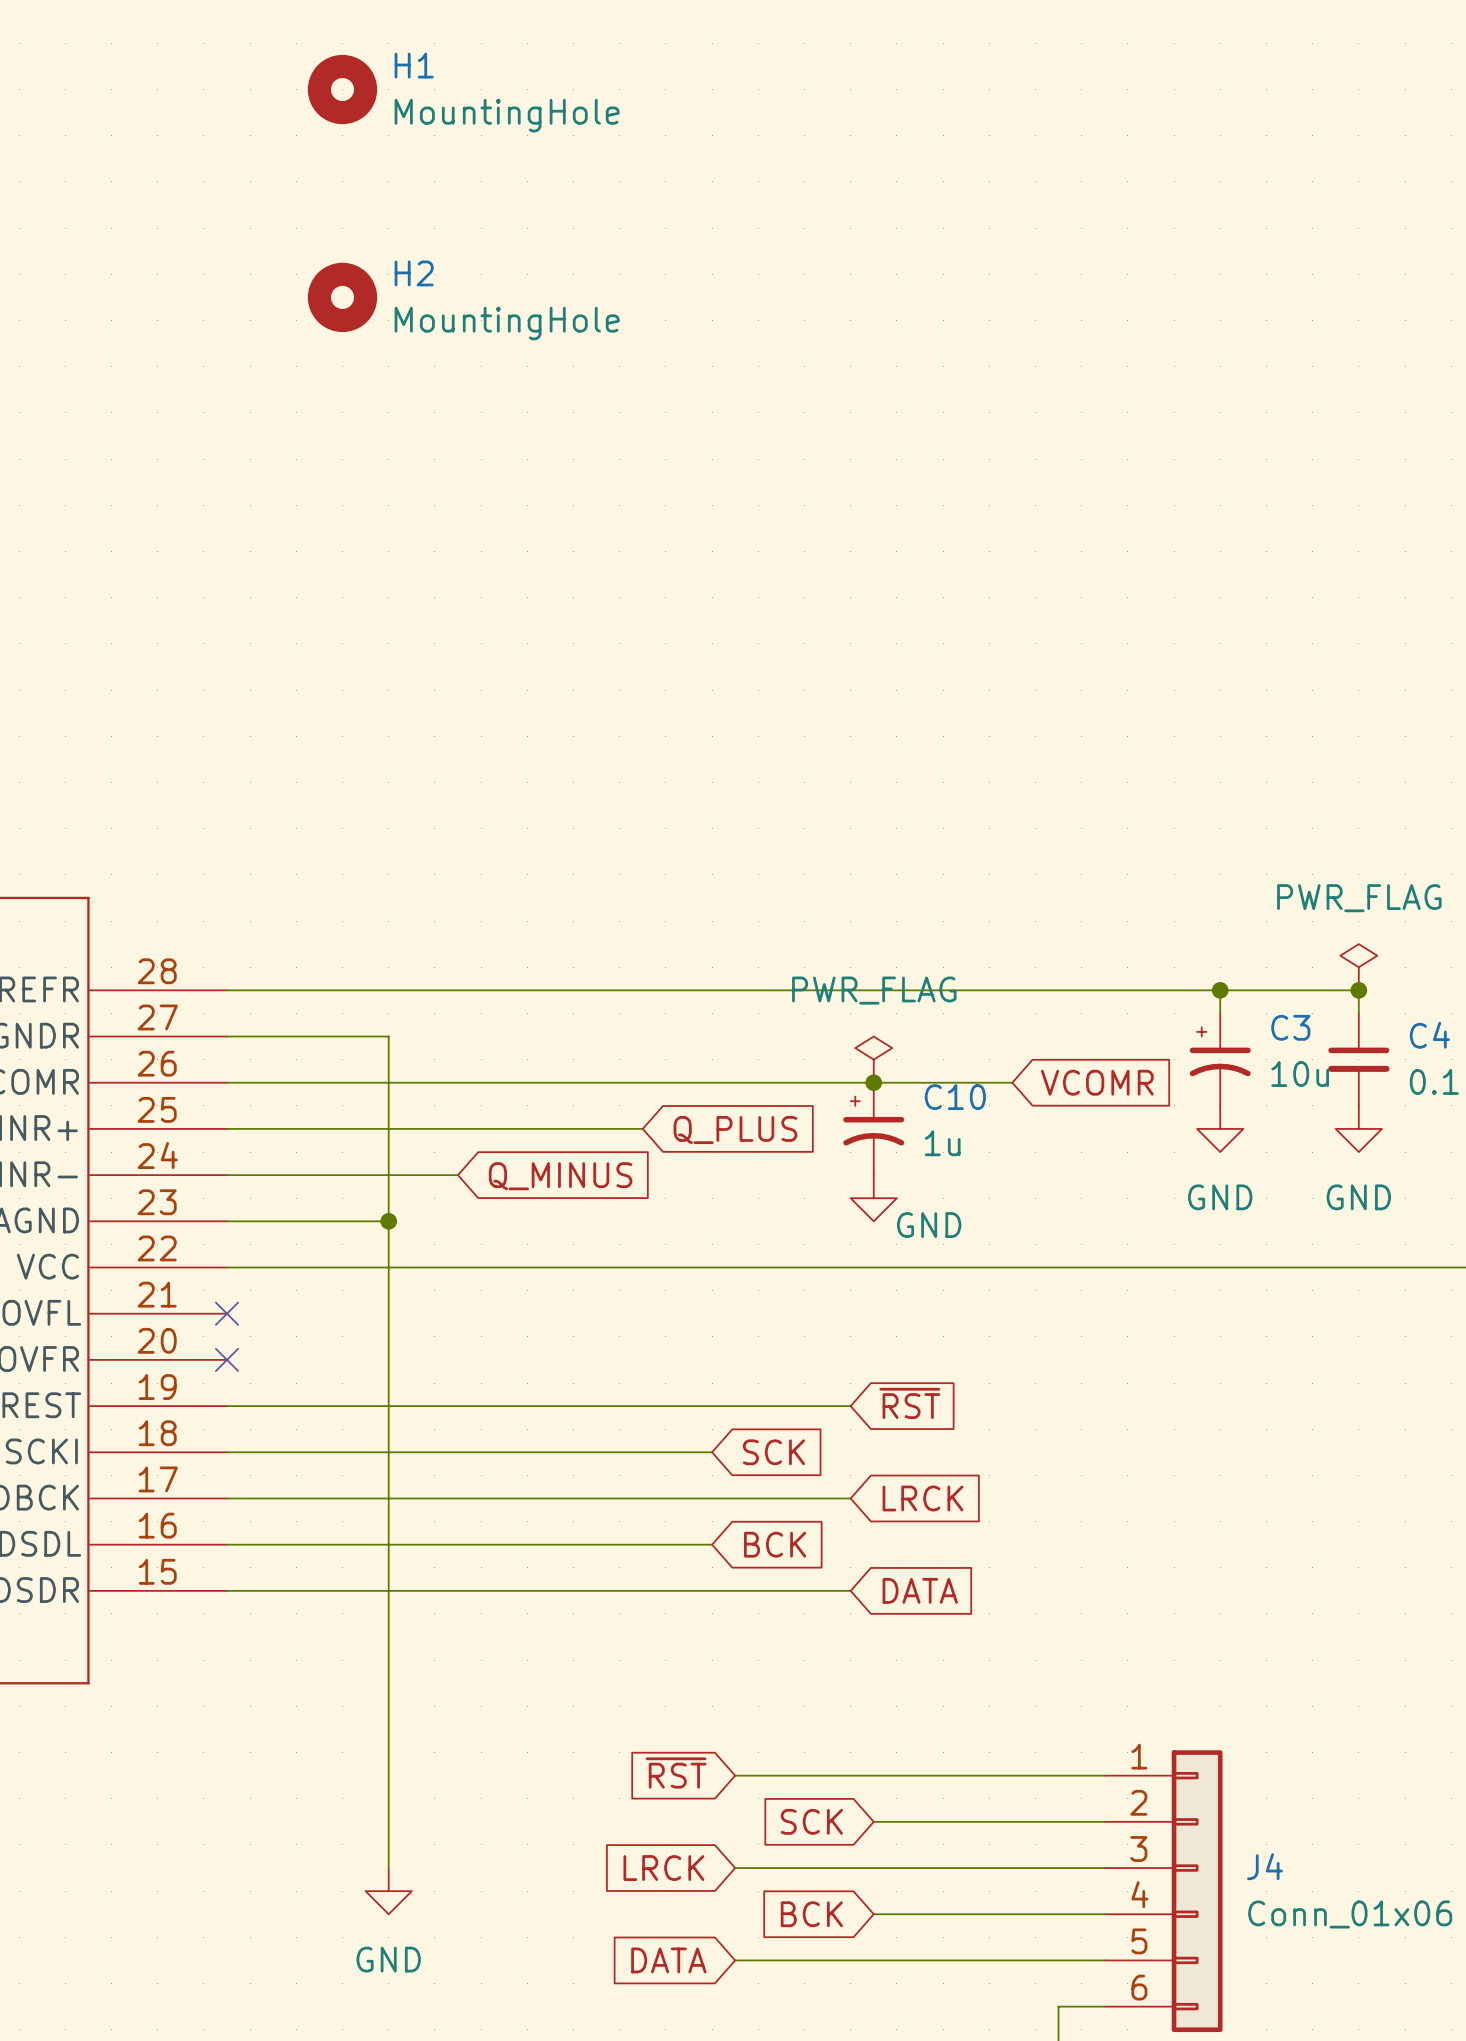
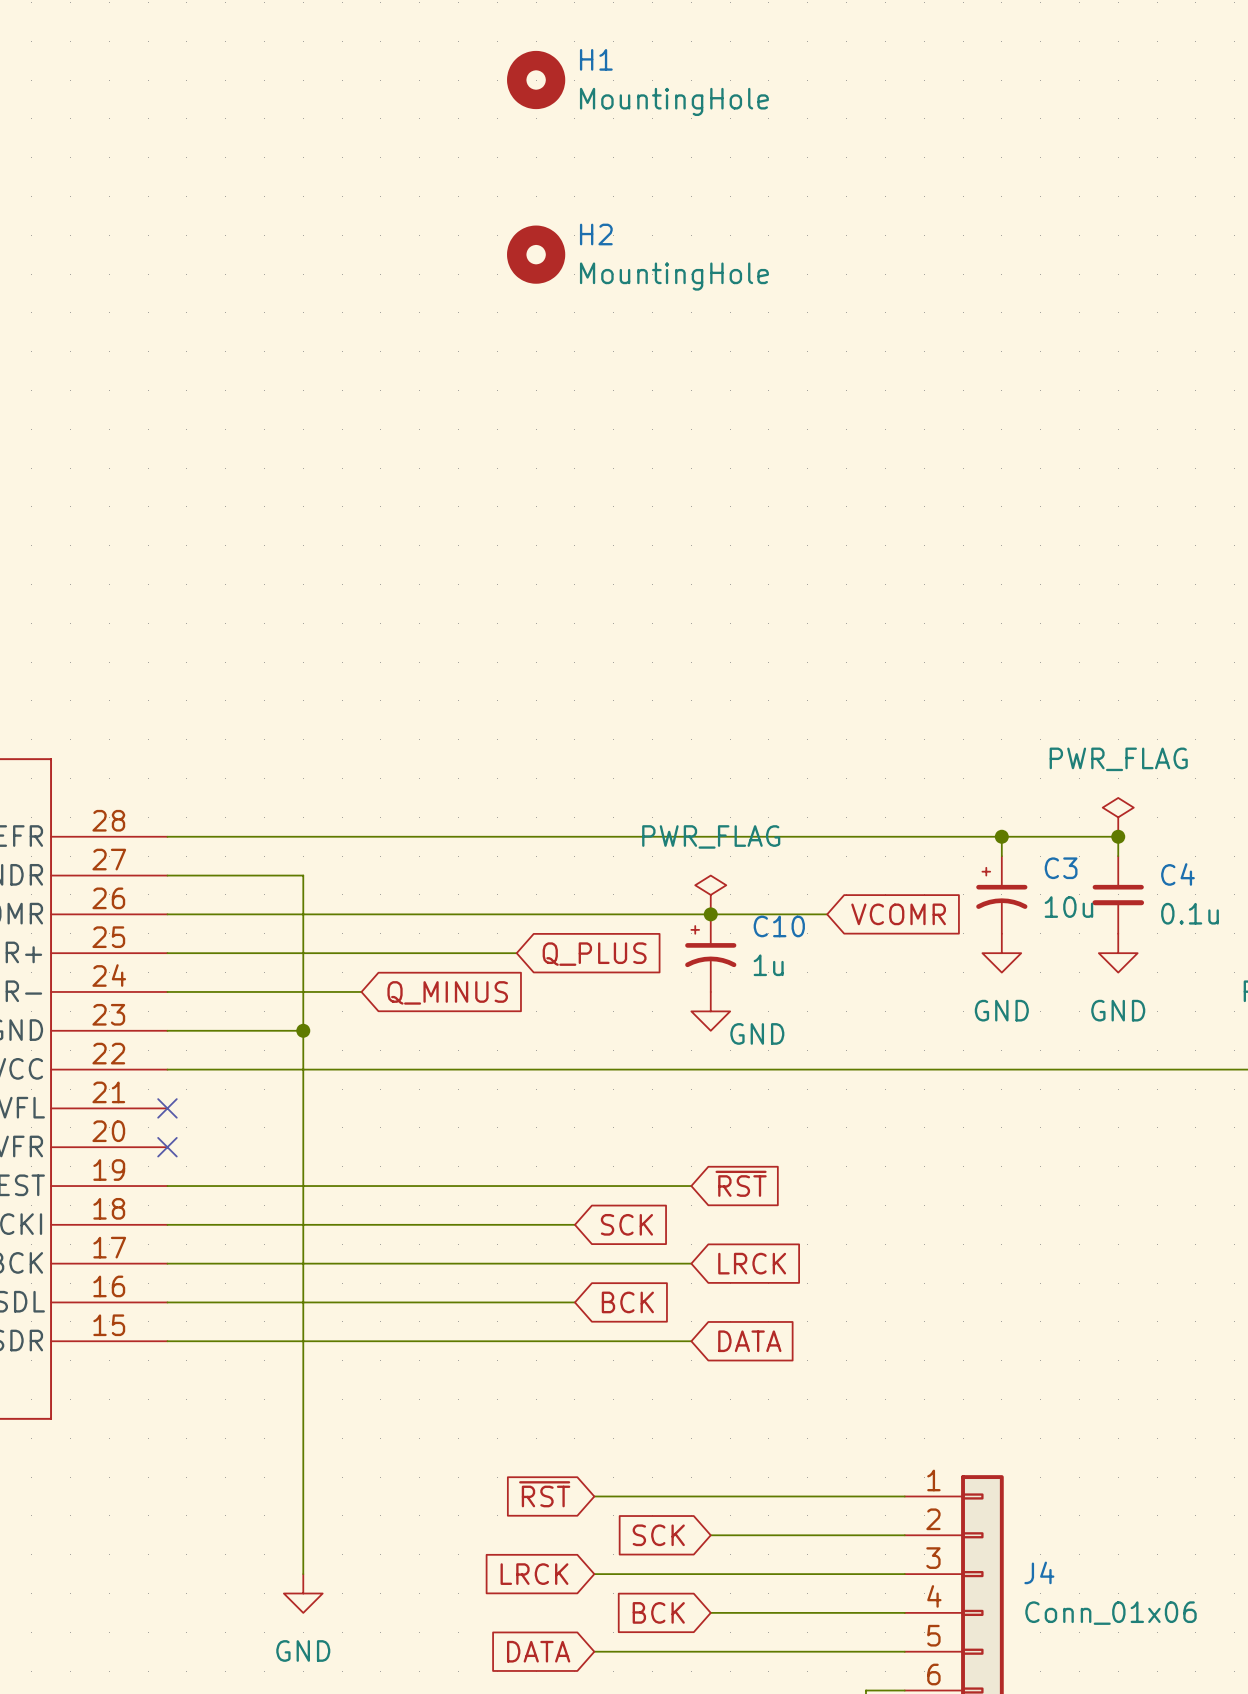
H1 position: (342, 89) -> (536, 80)
H2 position: (342, 297) -> (536, 254)

